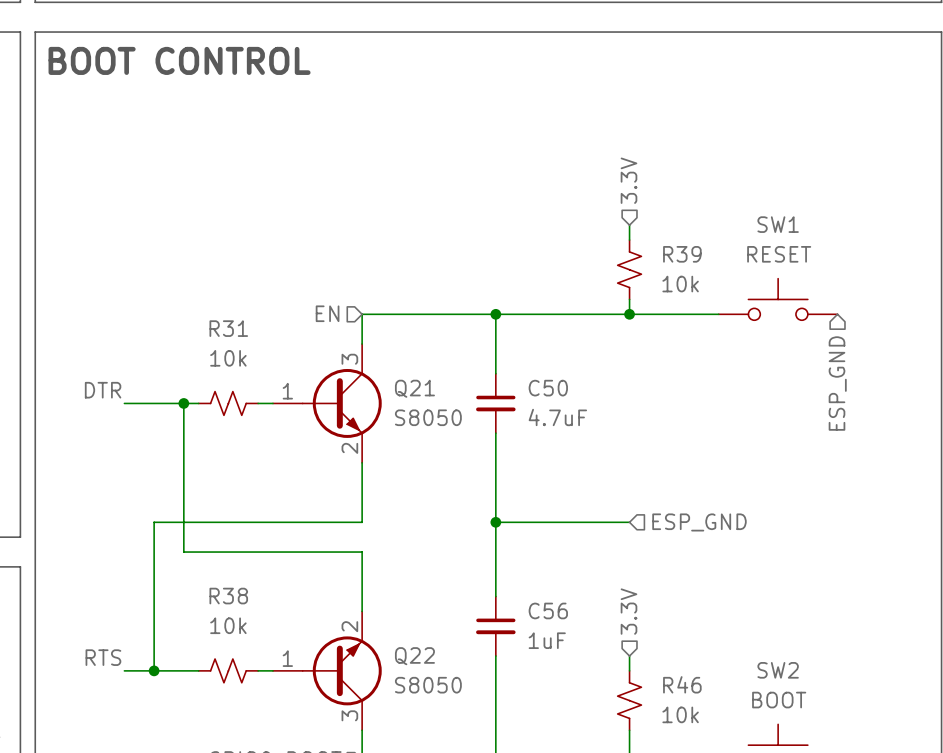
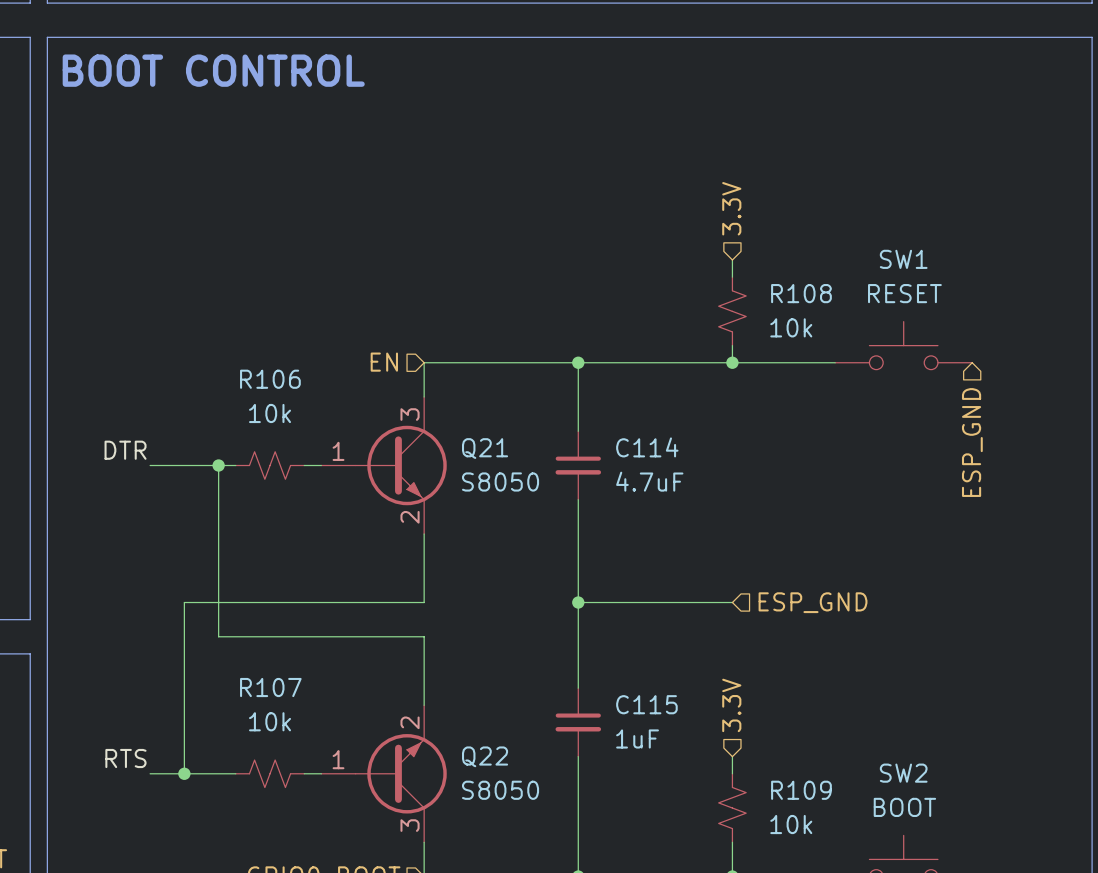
R39 name: R39 (682, 254) -> R108 (801, 293)
R31 name: R31 (228, 328) -> R106 (270, 379)
C50 name: C50 (548, 388) -> C114 (647, 447)
R38 name: R38 (228, 596) -> R107 (270, 687)
C56 name: C56 (548, 610) -> C115 (646, 704)
R46 name: R46 (682, 684) -> R109 (801, 790)

